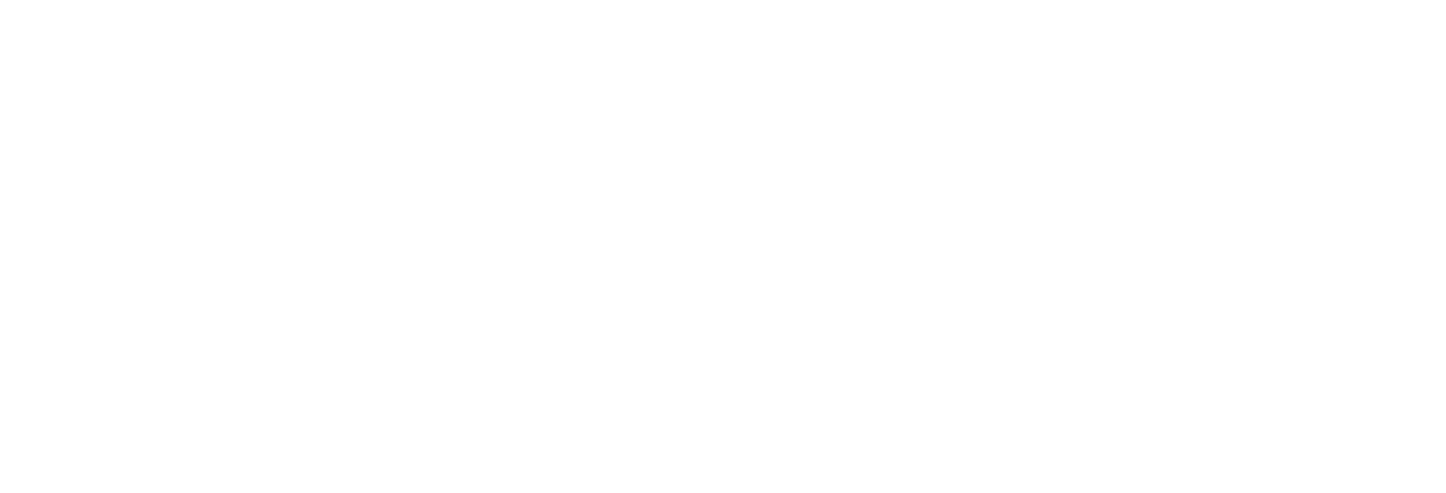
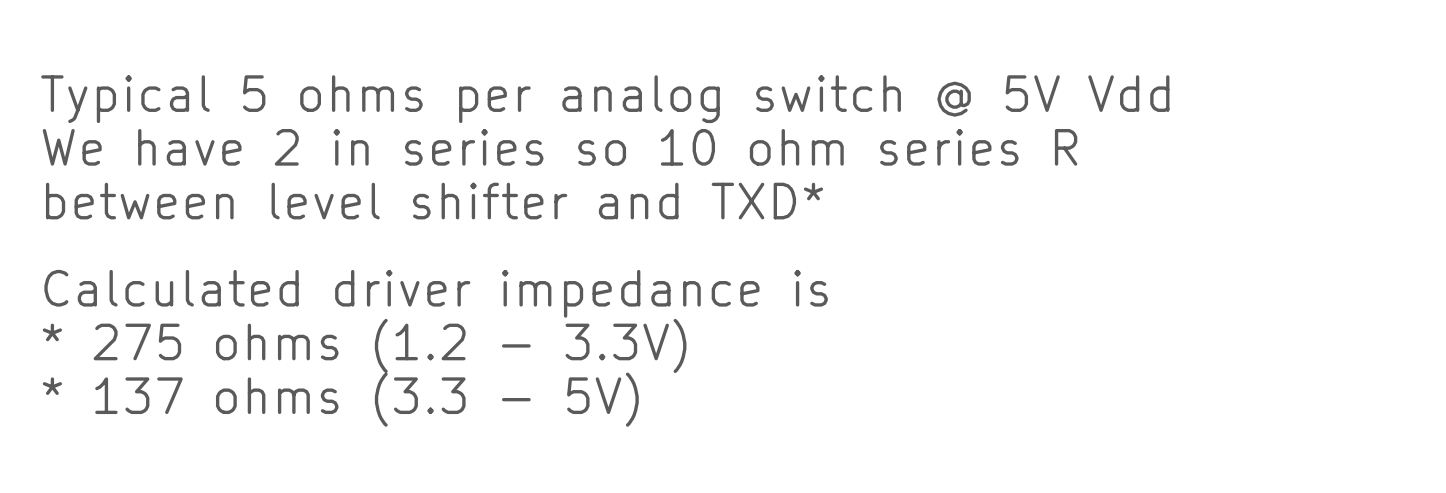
text: none -> Typical 5 ohms per analog switch @ 5V Vdd (605, 99)
text: none -> We have 2 in series so 10 ohm series R (560, 147)
text: none -> between level shifter and TXD* (434, 201)
text: none -> Calculated driver impedance is (436, 293)
text: none -> * 275 ohms (1.2 - 3.3V) (364, 345)
text: none -> * 137 ohms (3.3 - 5V) (340, 399)

